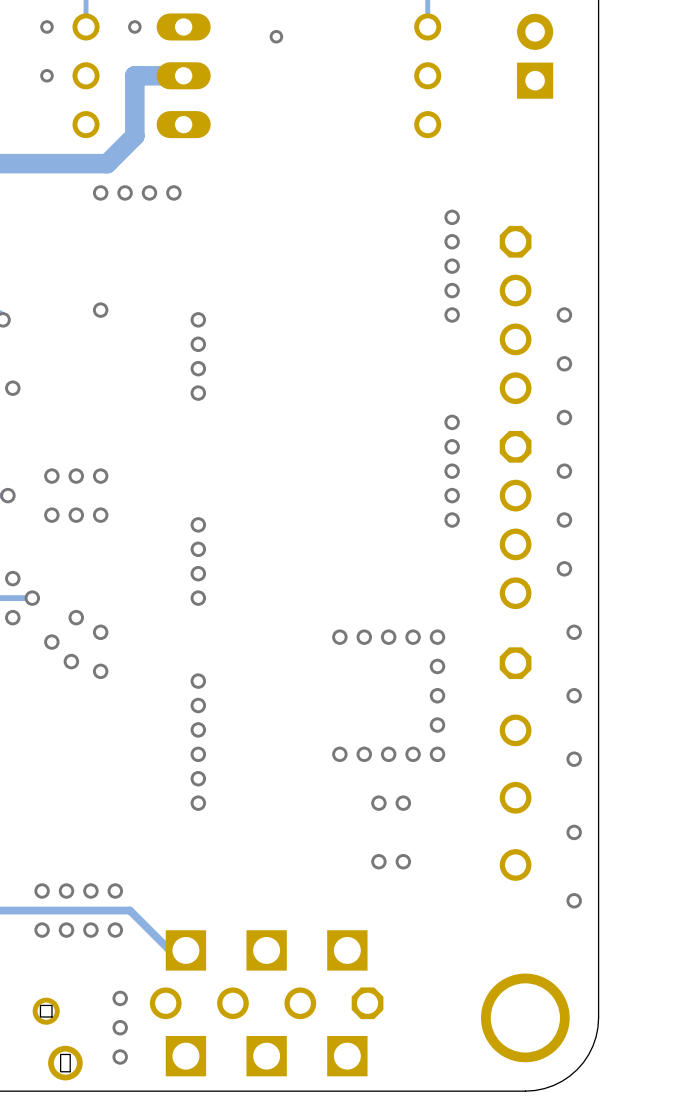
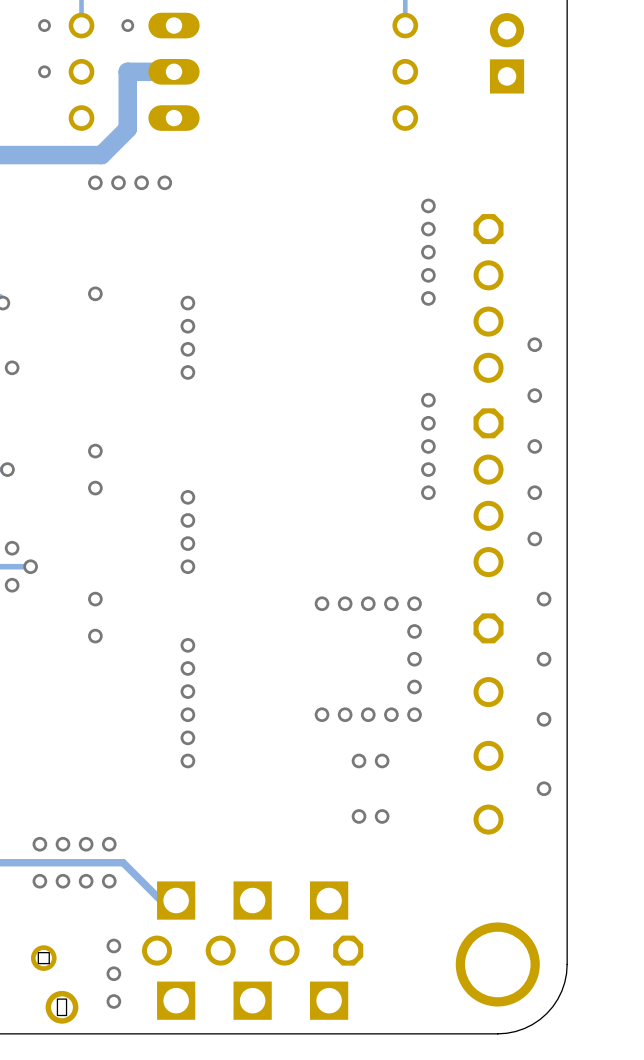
via: (276, 36) -> none
via: (564, 314) -> none
via: (51, 476) -> none
via: (76, 476) -> none
via: (51, 515) -> none
via: (76, 515) -> none
via: (76, 617) -> none
via: (51, 642) -> none
via: (71, 661) -> none
via: (574, 900) -> none

